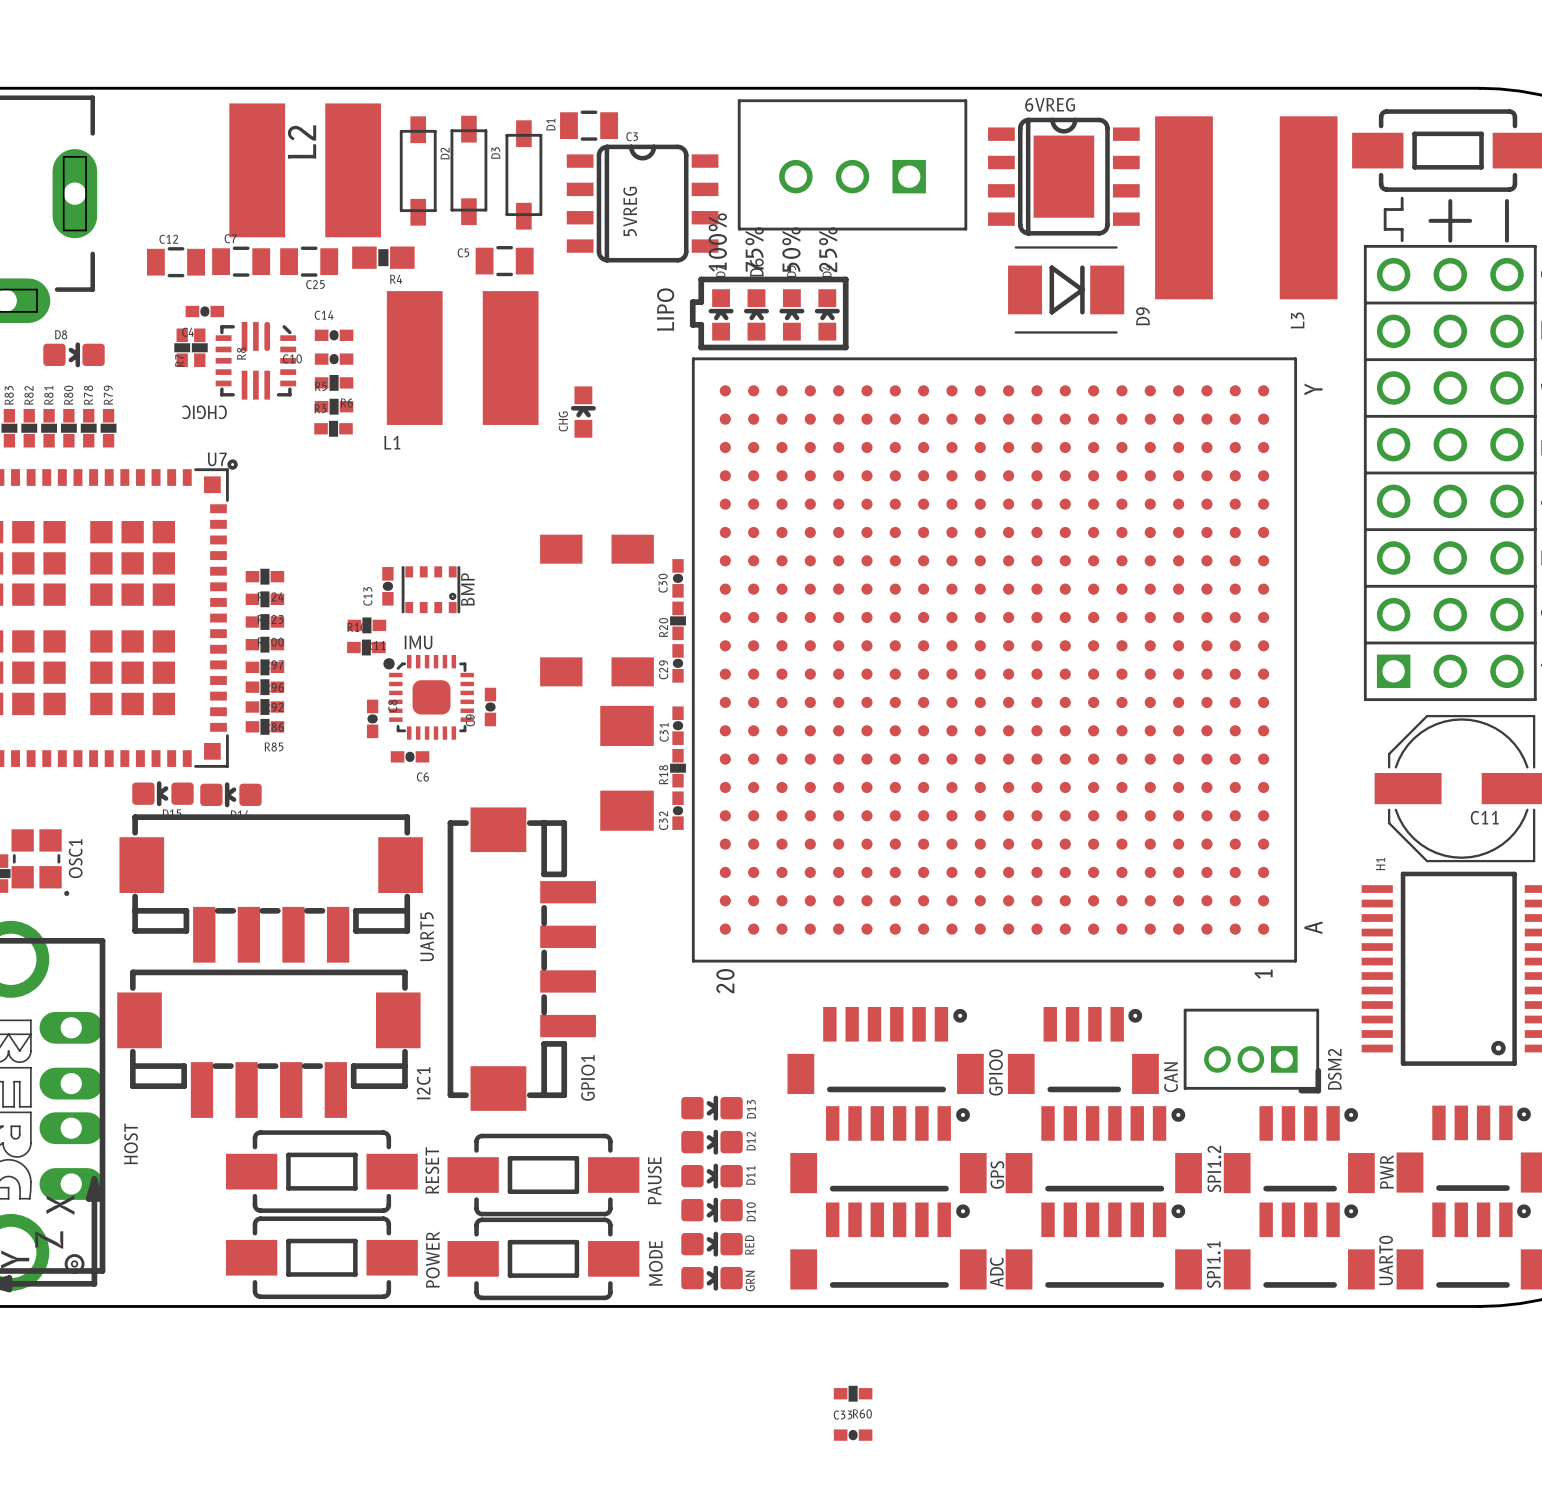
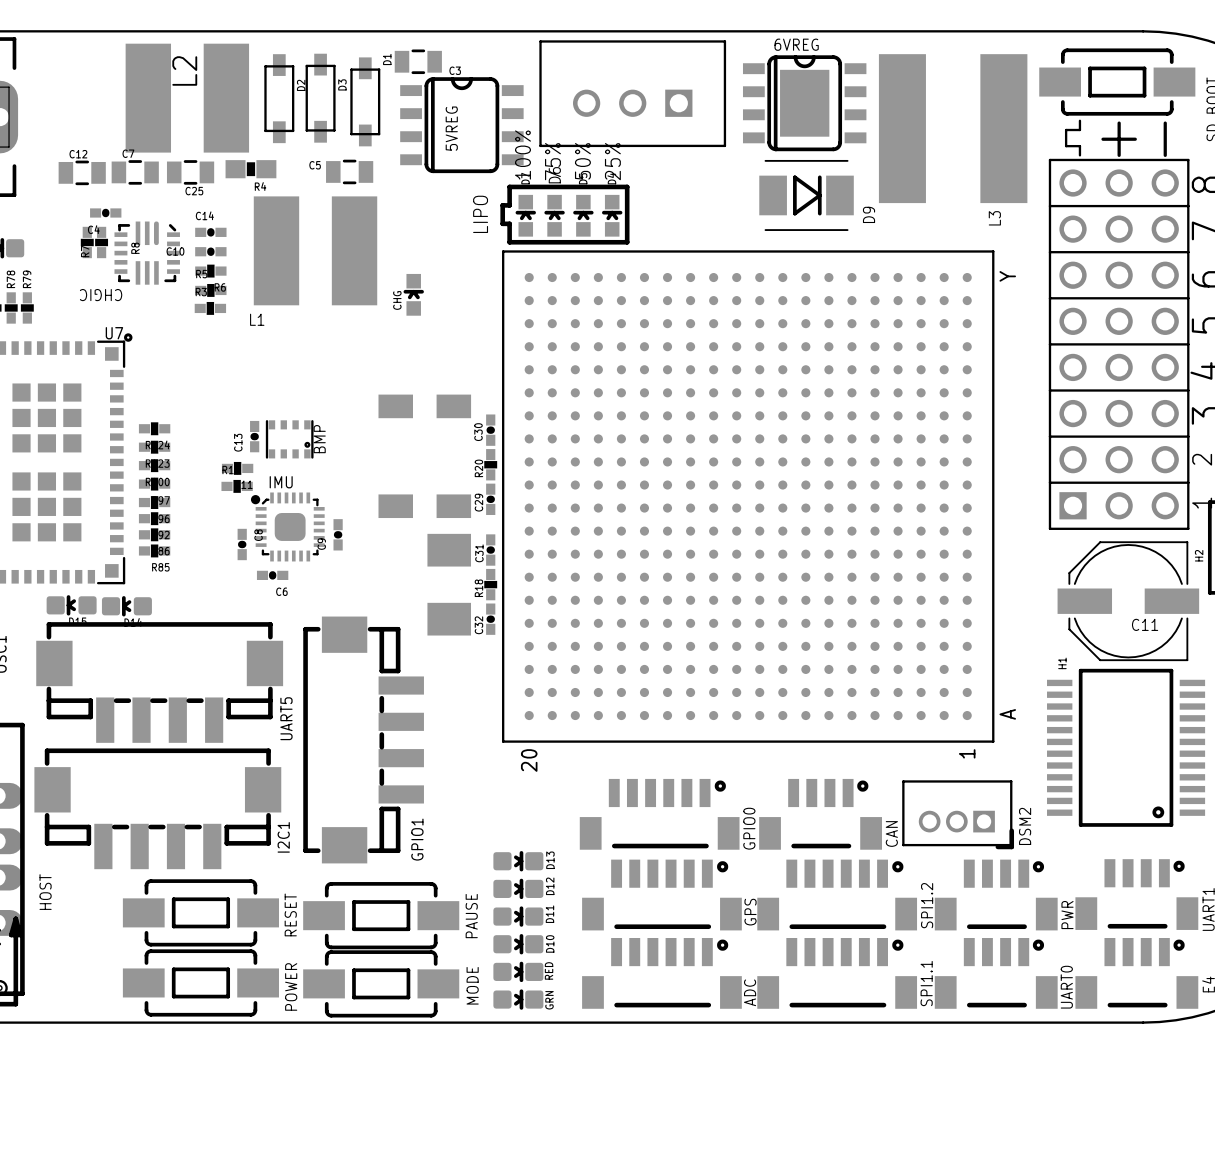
R60: (853, 1393) -> none
C33: (853, 1435) -> none

